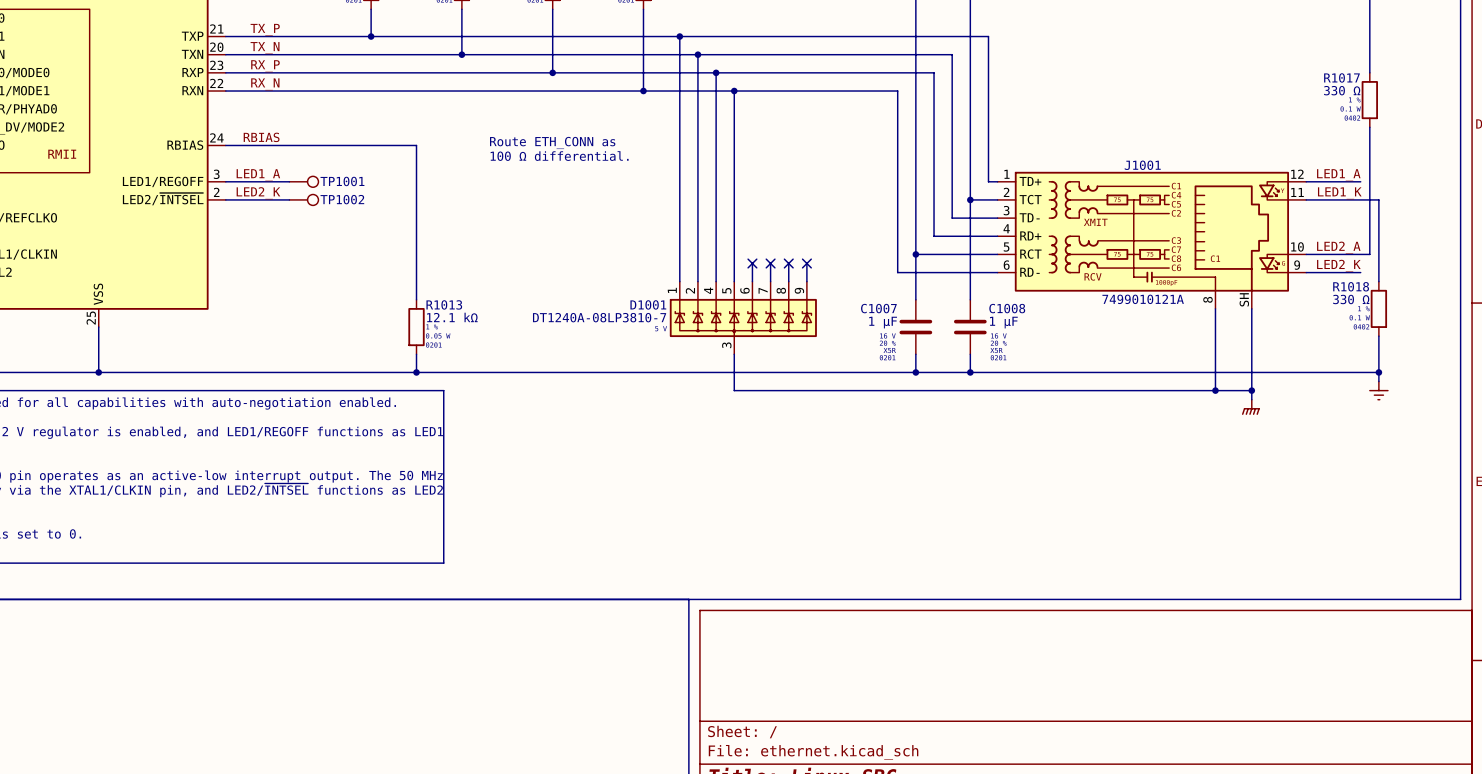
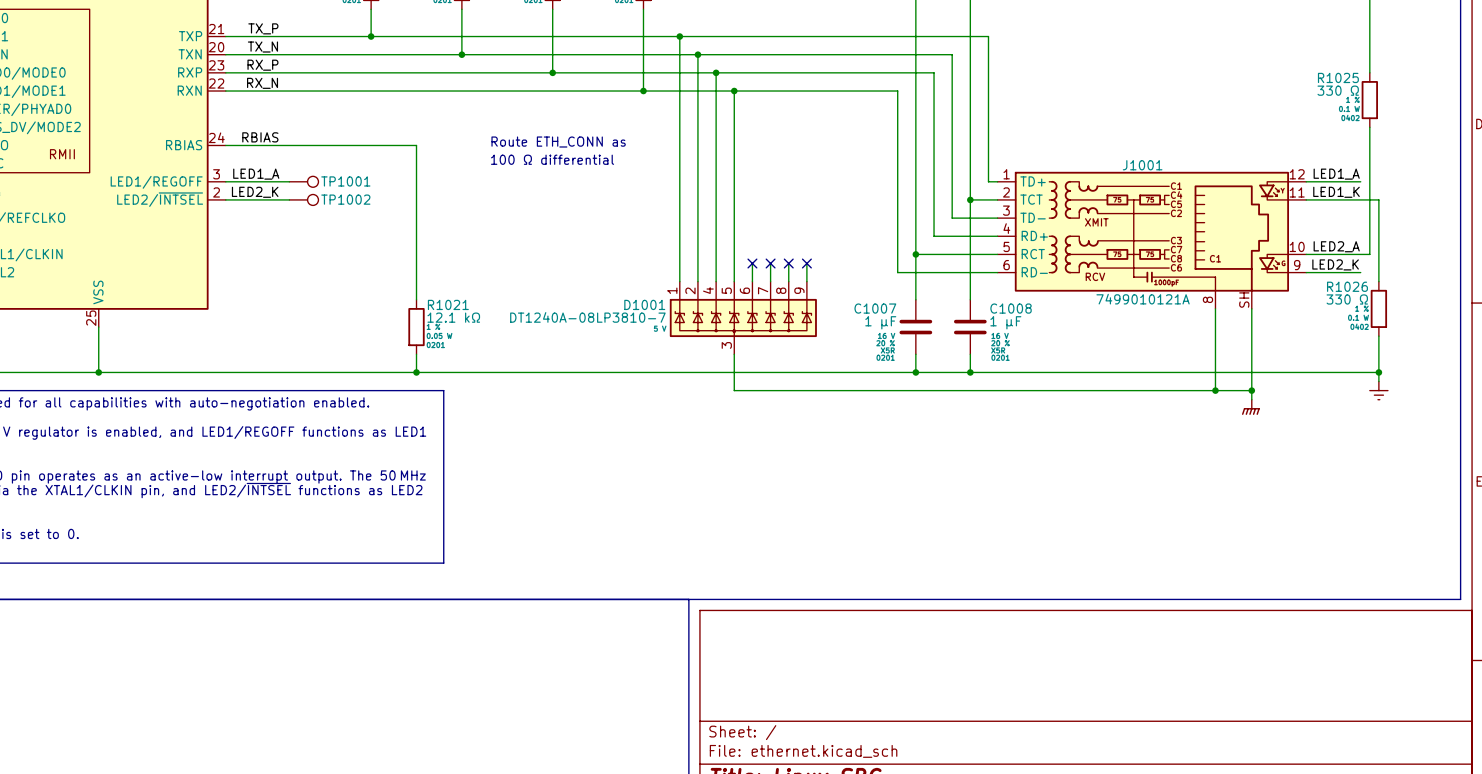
R1017 name: R1017 (1341, 77) -> R1025 (1338, 77)
text: 100 Ω differential. (559, 156) -> 100 Ω differential (552, 159)
R1018 name: R1018 (1351, 286) -> R1026 (1347, 286)
R1013 name: R1013 (444, 304) -> R1021 (448, 304)

